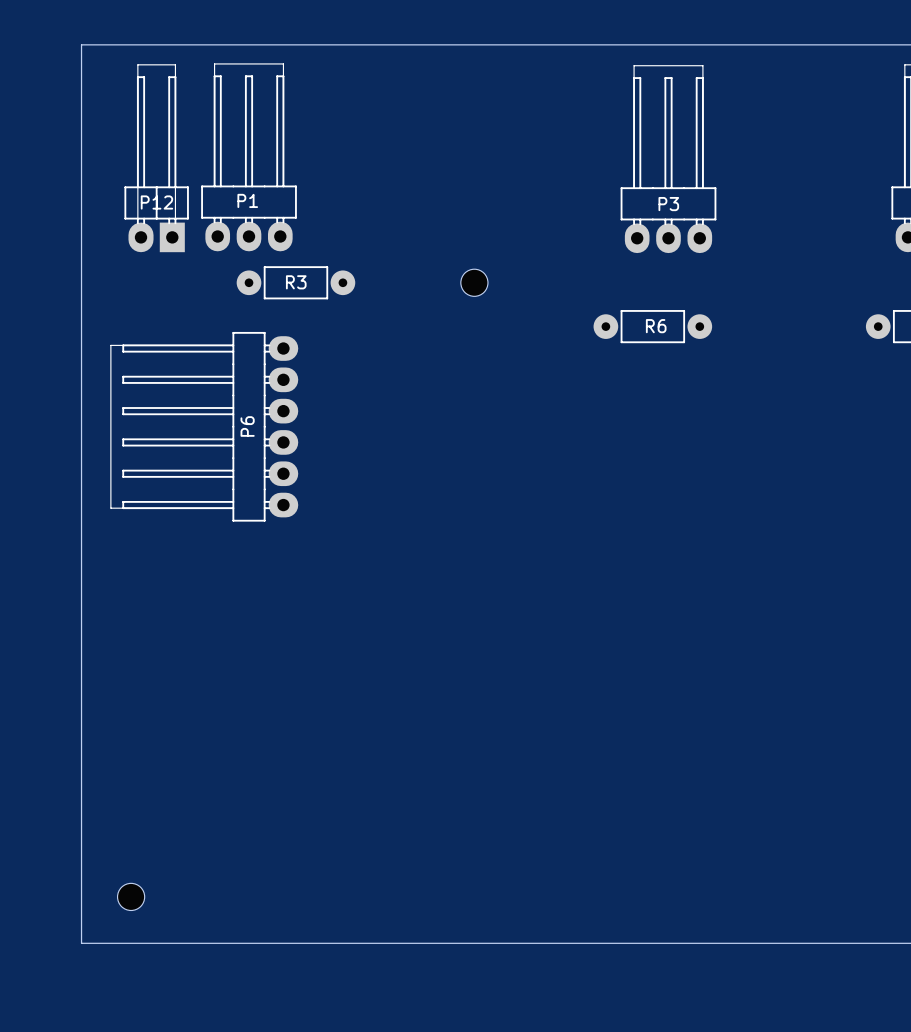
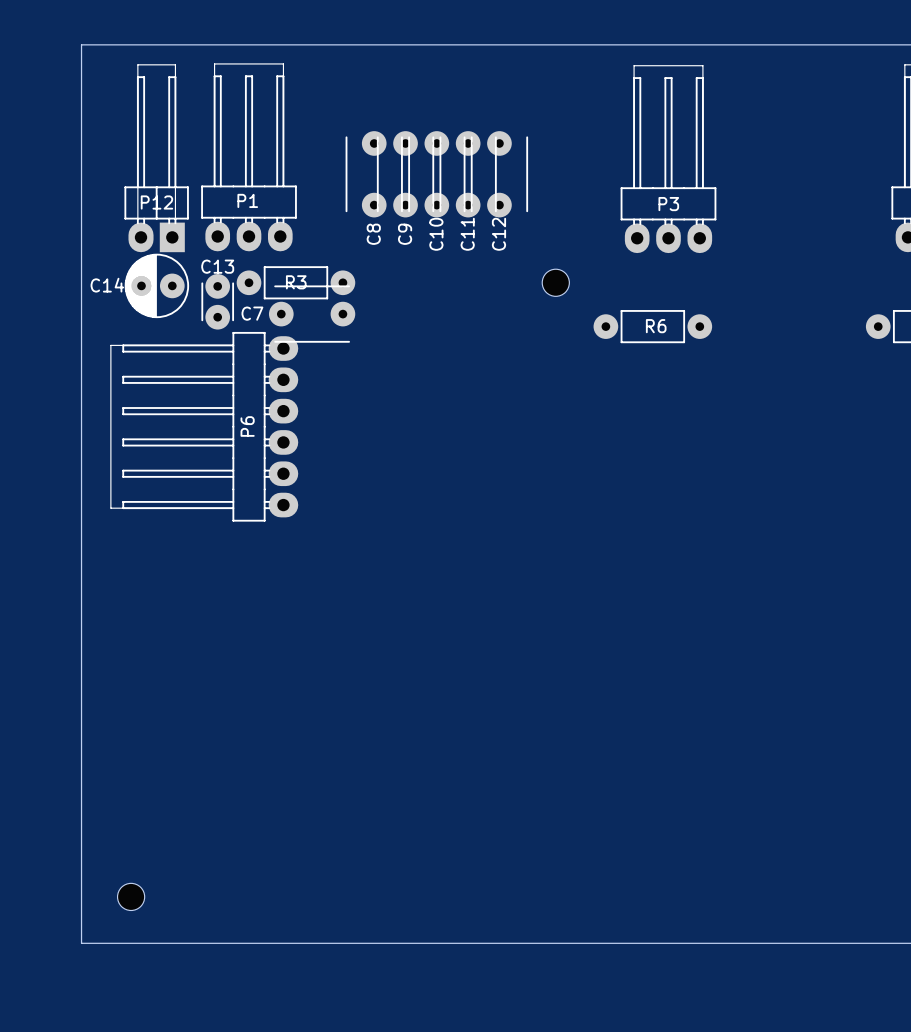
C8: none -> (374, 174)
C9: none -> (405, 174)
C10: none -> (436, 174)
C11: none -> (468, 174)
C12: none -> (499, 174)
part position: (474, 282) -> (555, 282)
C14: none -> (156, 285)
C13: none -> (217, 301)
C7: none -> (312, 314)

